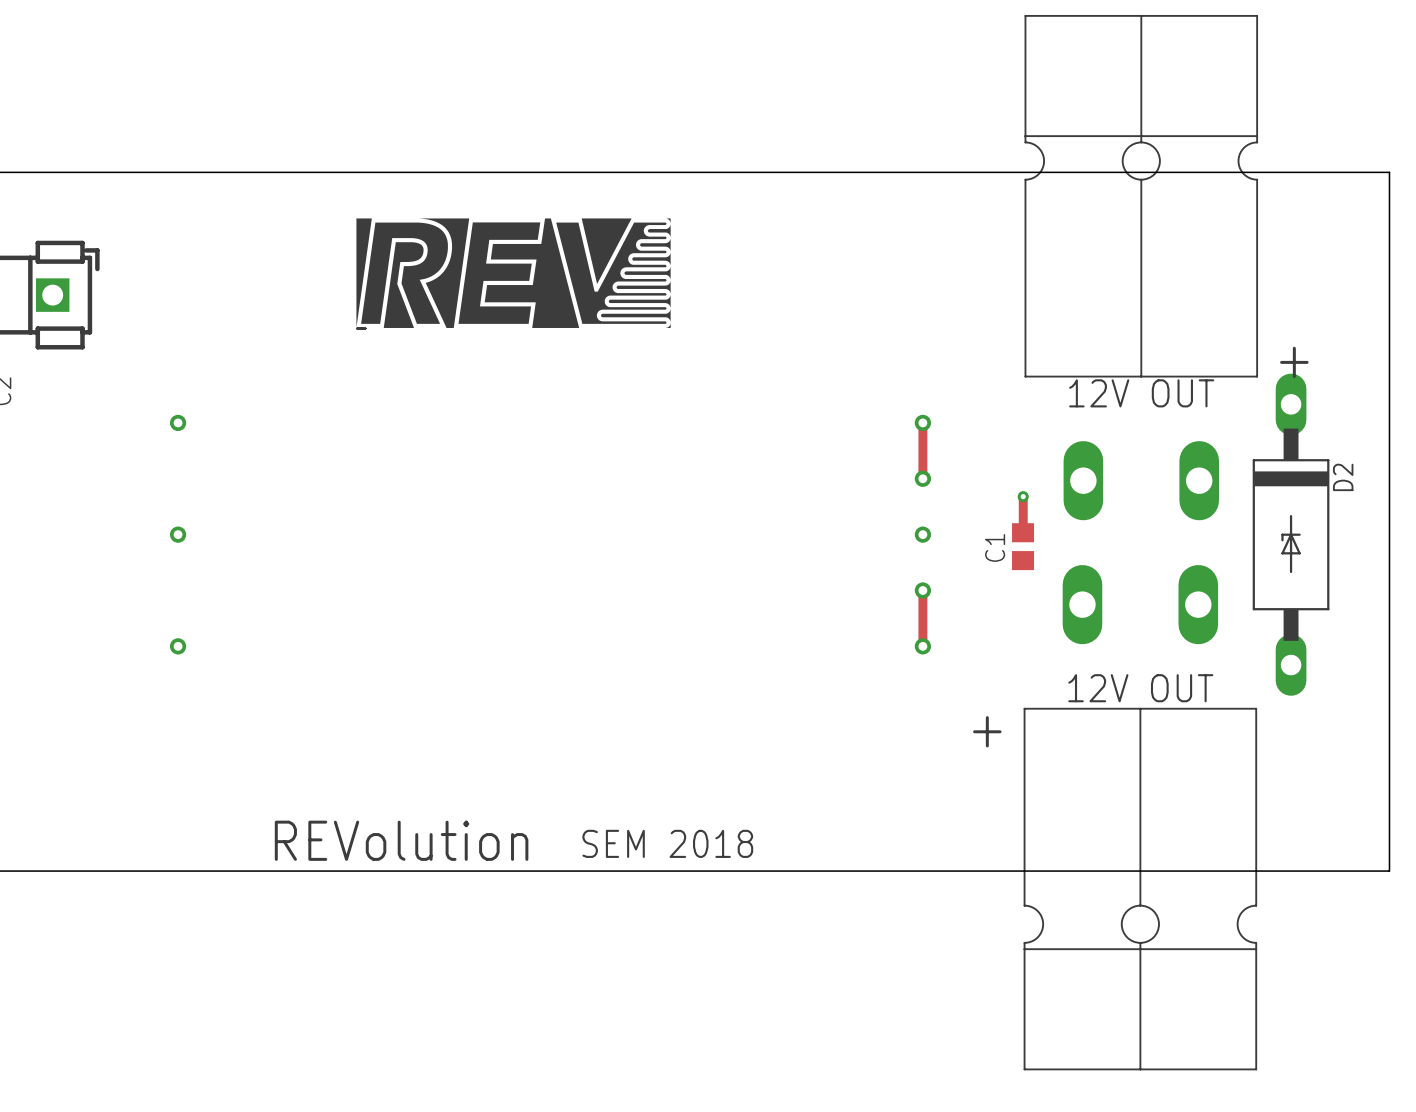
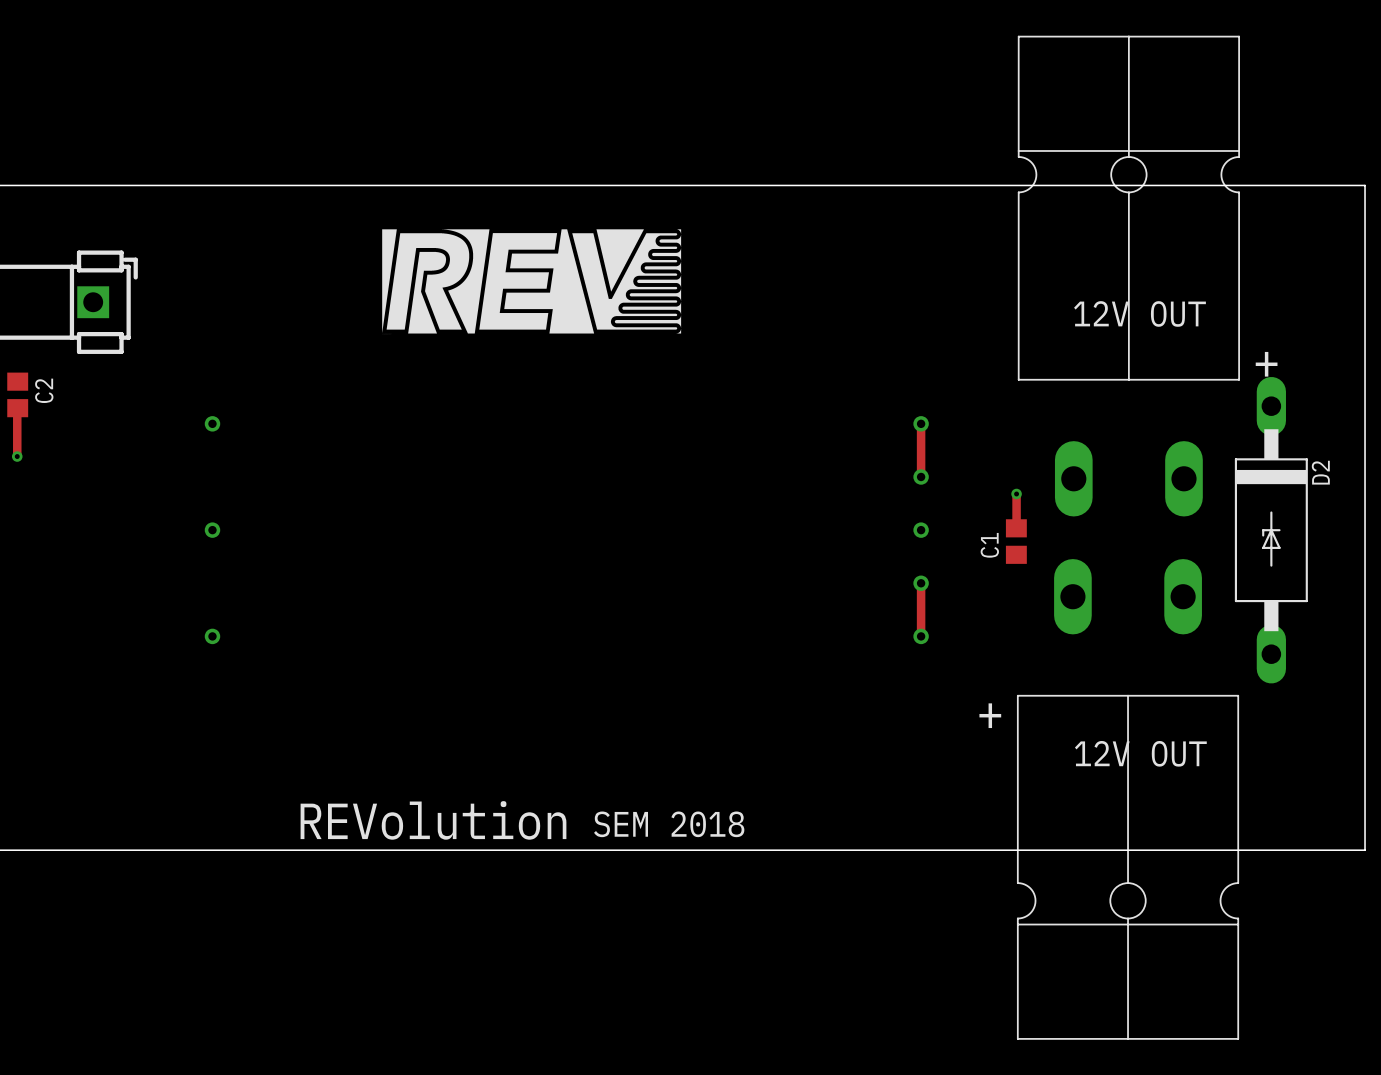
text position: 12V OUT (1141, 393) -> 12V OUT (1139, 313)
text position: 12V OUT (1140, 688) -> 12V OUT (1140, 753)

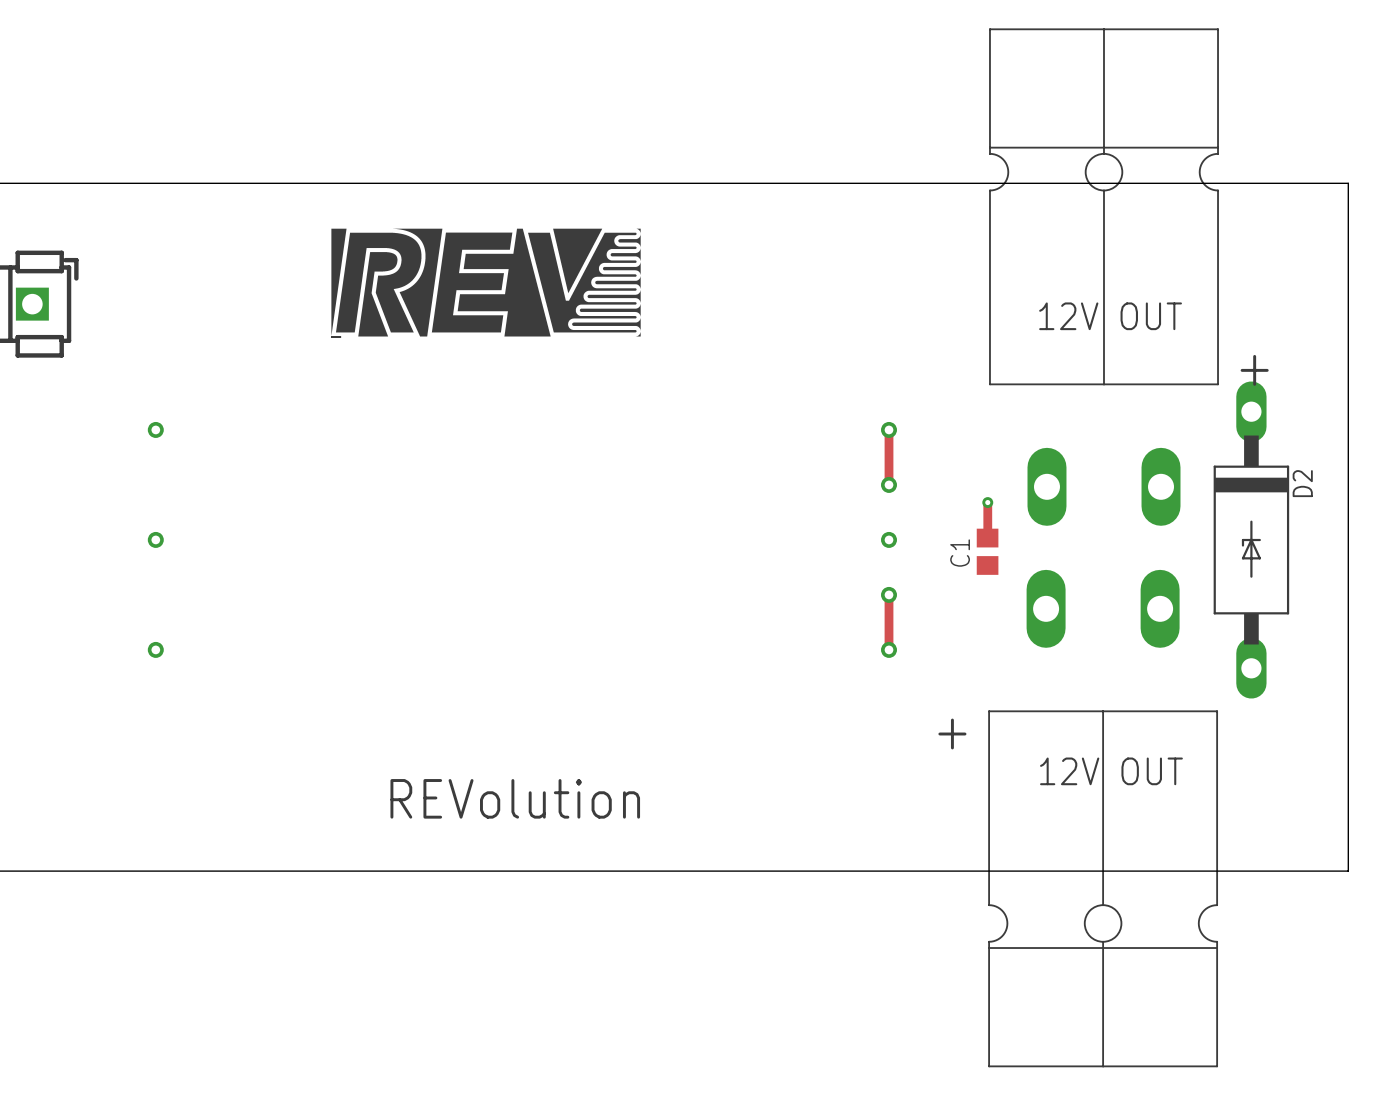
text position: REVolution (433, 820) -> REVolution (515, 798)
text: SEM 2018 (669, 824) -> none

